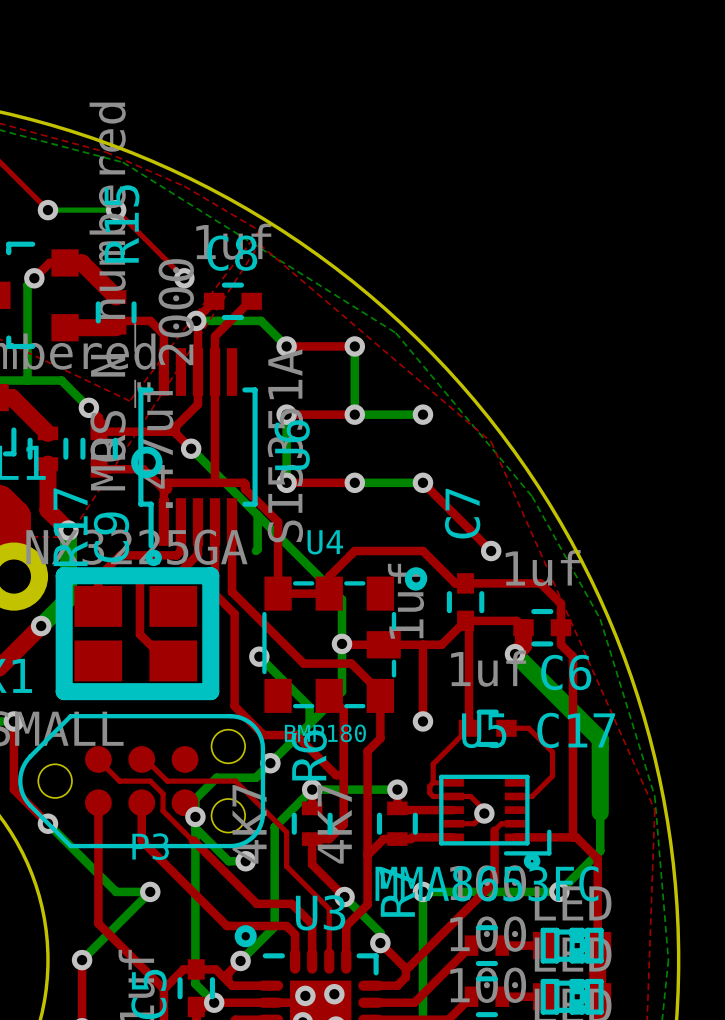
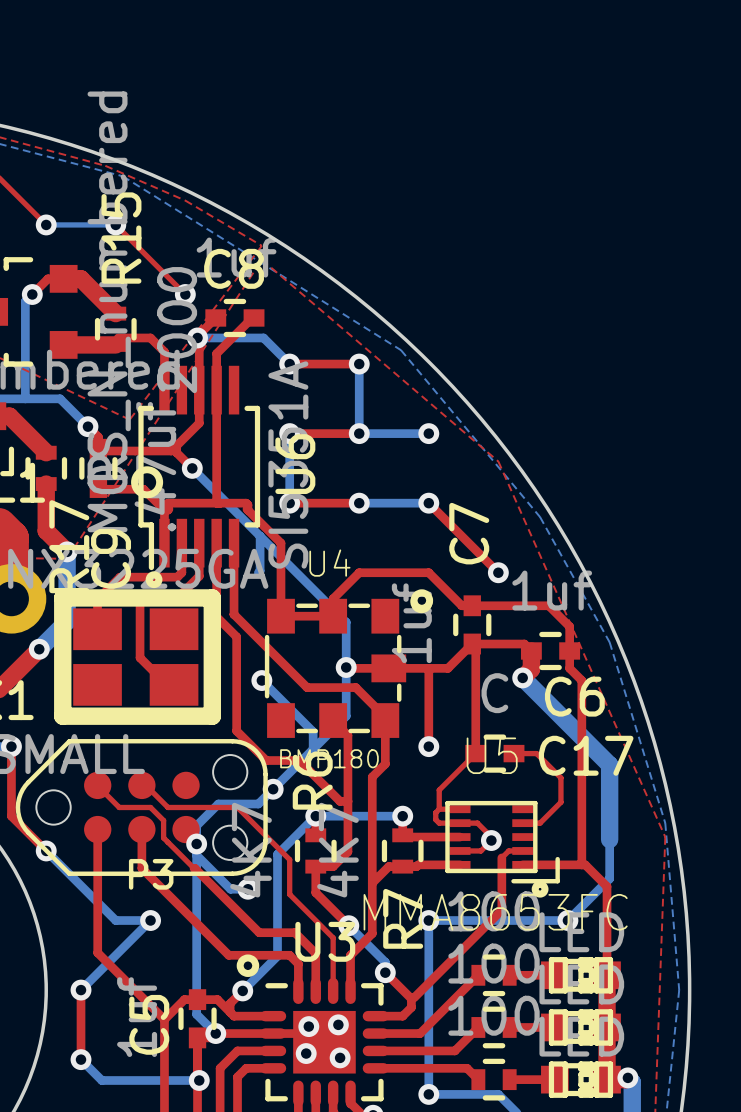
C17 value: 1uf (488, 668) -> C (494, 693)

